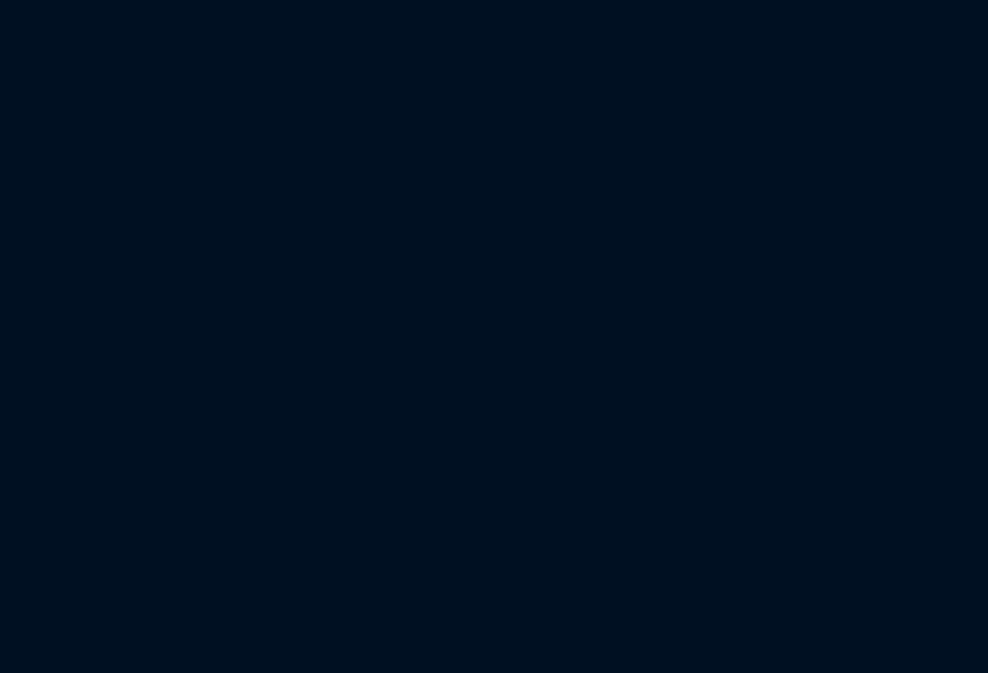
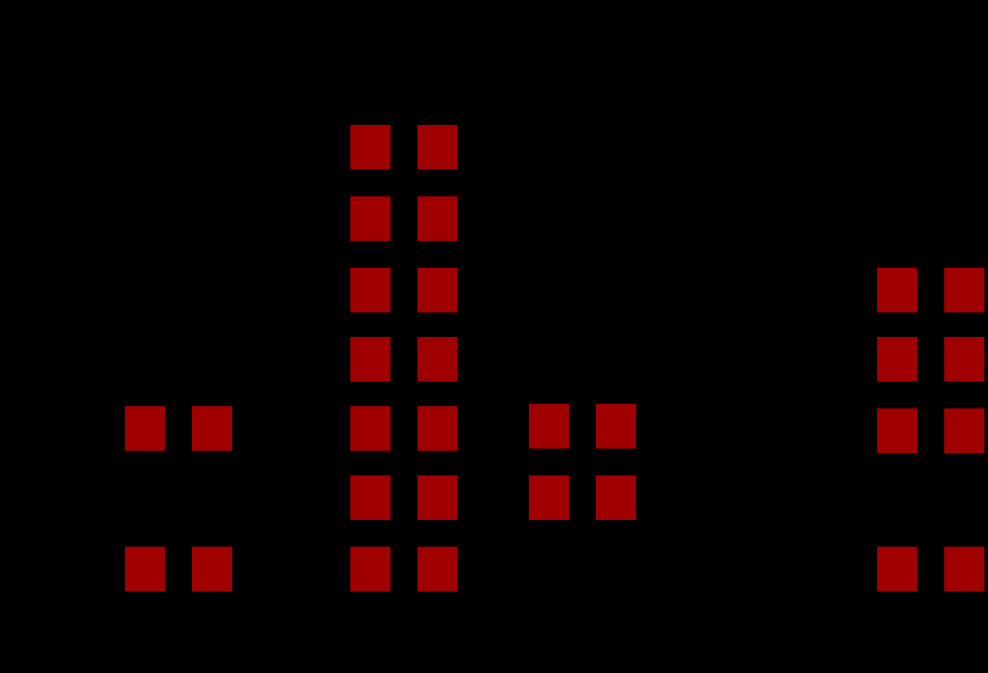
part: none -> (403, 147)
part: none -> (403, 218)
part: none -> (403, 290)
part: none -> (930, 290)
part: none -> (403, 359)
part: none -> (930, 359)
part: none -> (582, 426)
part: none -> (178, 428)
part: none -> (403, 428)
part: none -> (930, 430)
part: none -> (403, 497)
part: none -> (582, 497)
part: none -> (178, 569)
part: none -> (403, 569)
part: none -> (930, 569)

